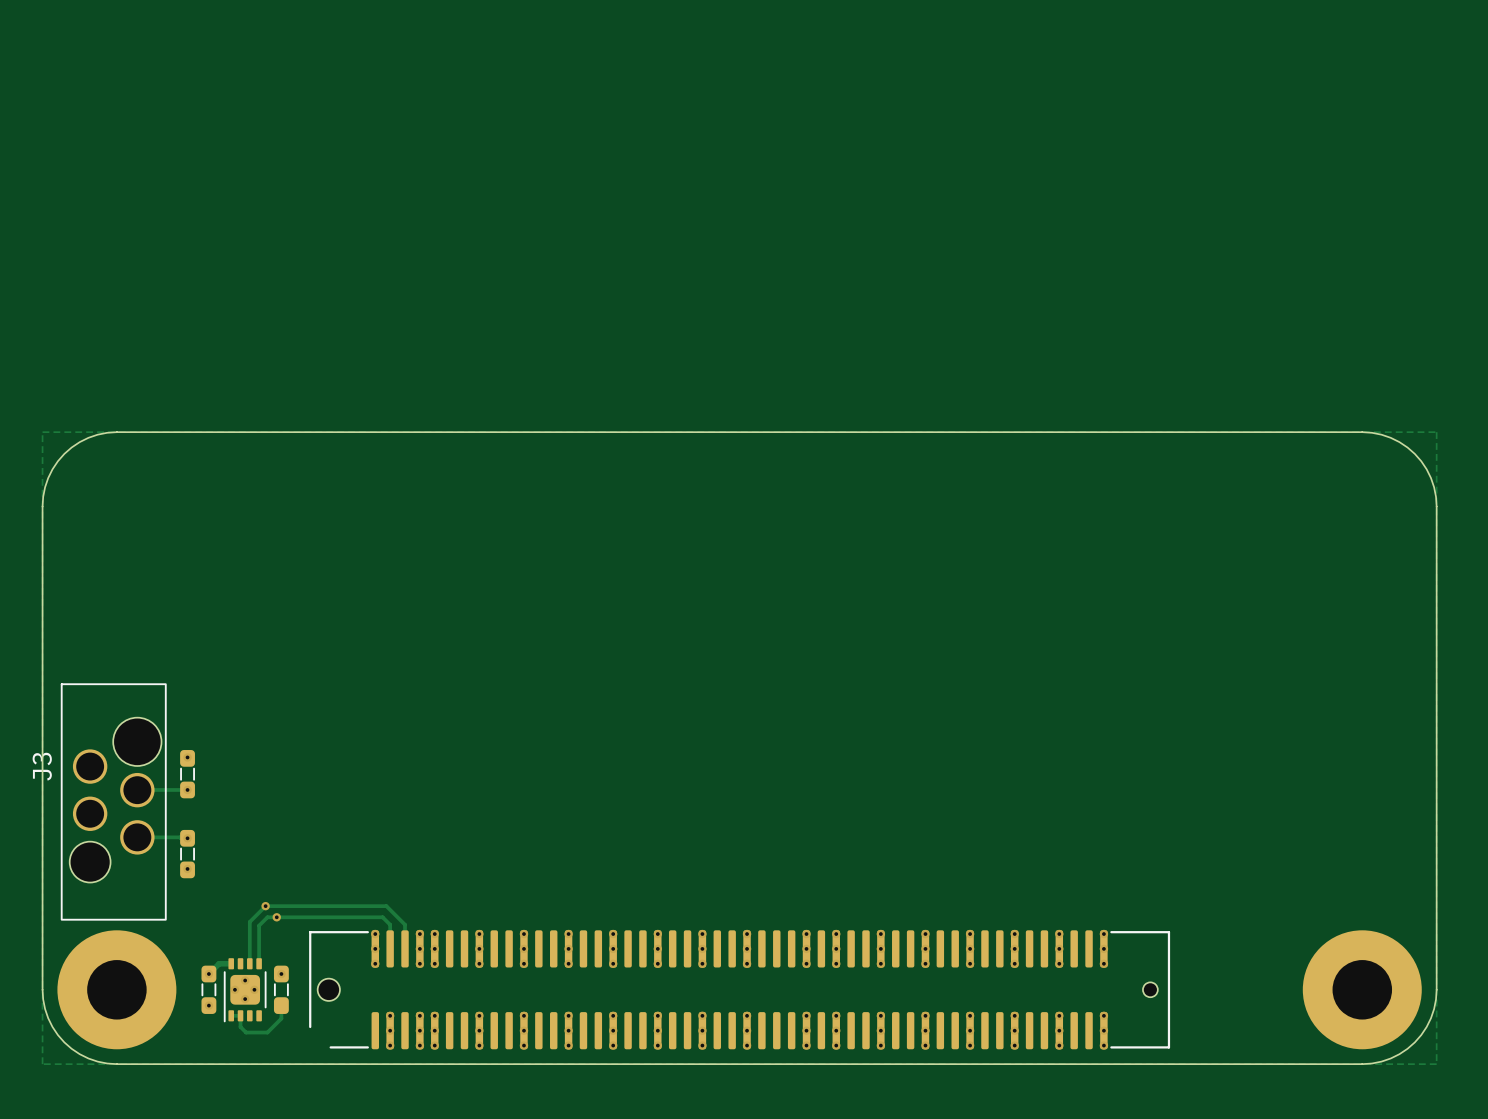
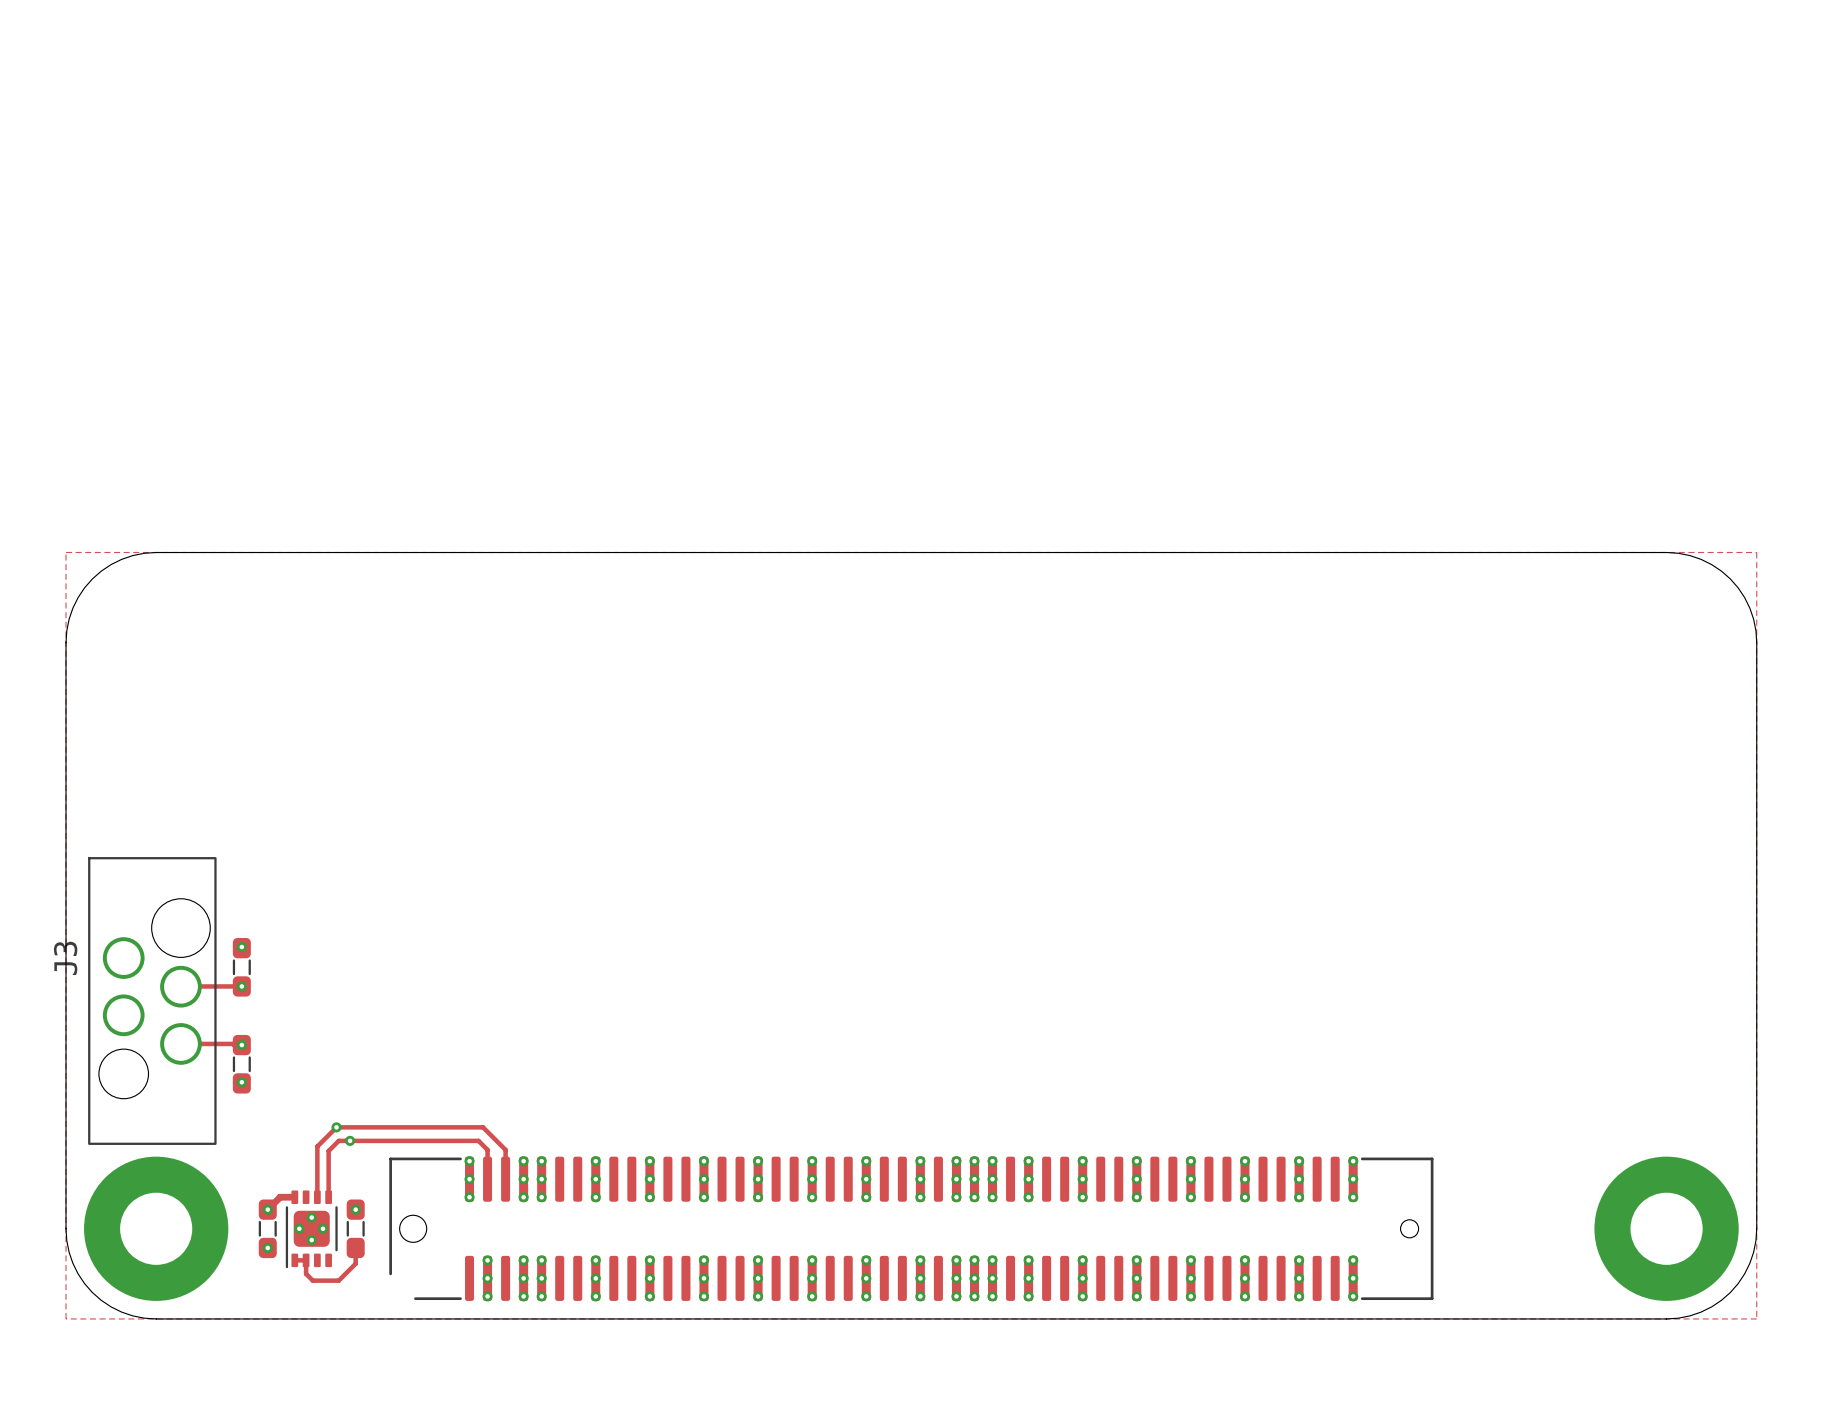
via: none -> (956, 1161)
via: none -> (974, 1161)
via: none -> (956, 1179)
via: none -> (974, 1179)
via: none -> (956, 1197)
via: none -> (974, 1197)
via: none -> (956, 1260)
via: none -> (974, 1260)
via: none -> (956, 1278)
via: none -> (974, 1278)
via: none -> (956, 1296)
via: none -> (974, 1296)

